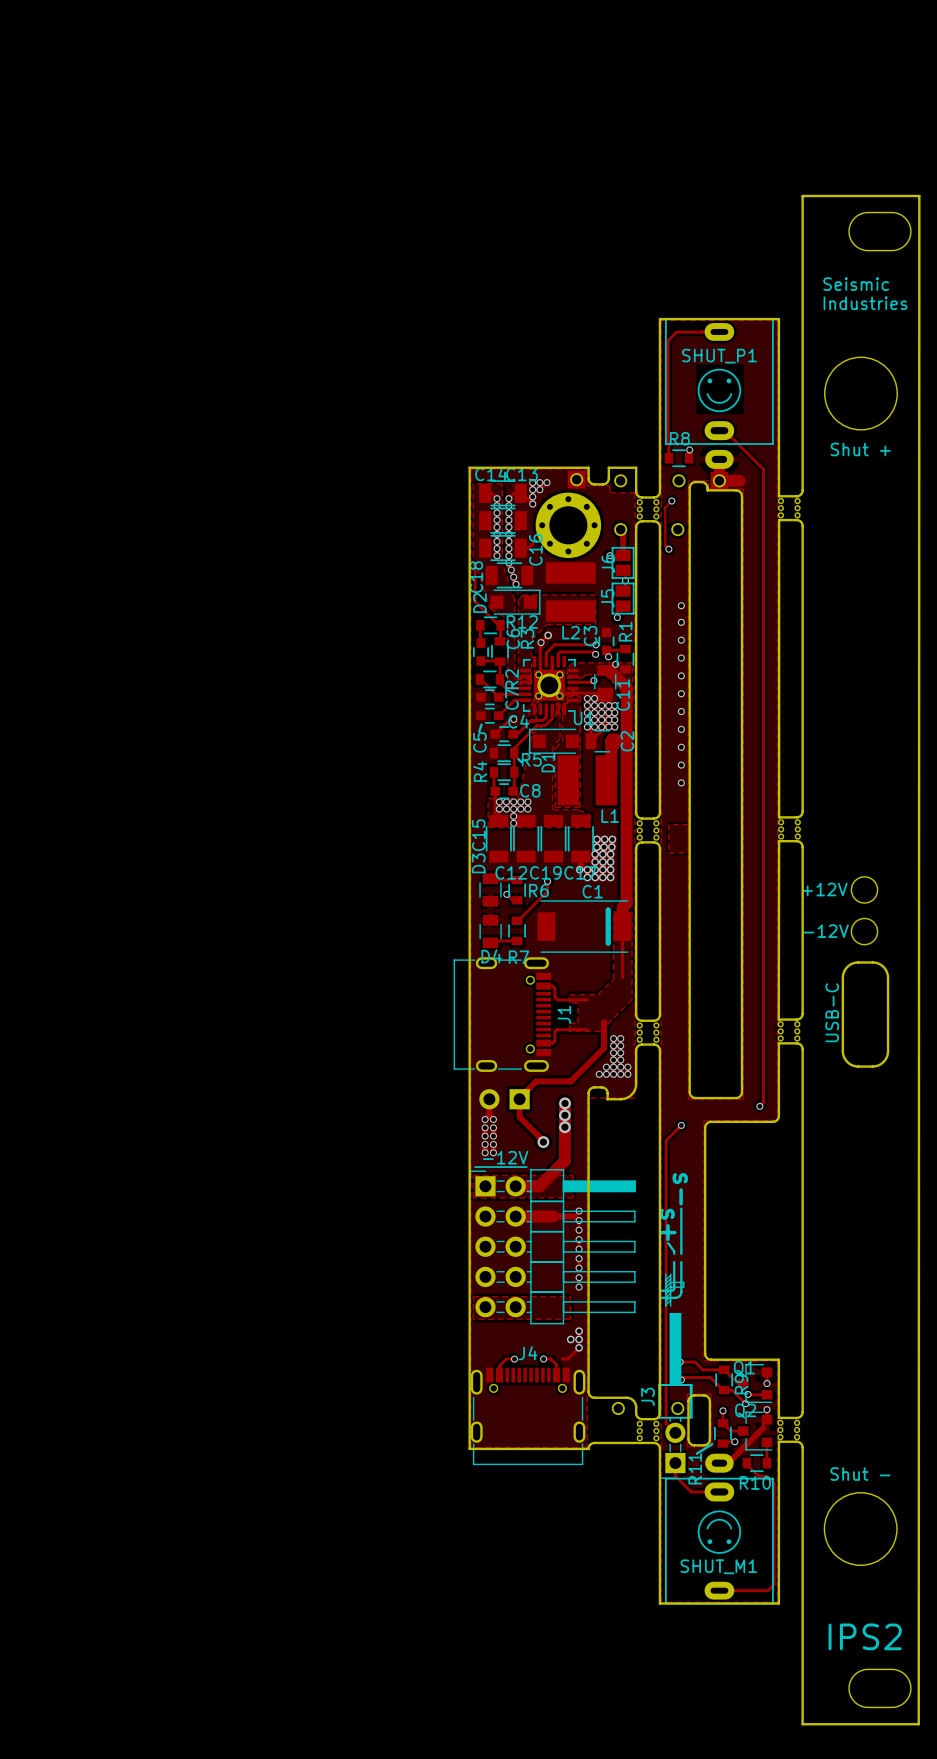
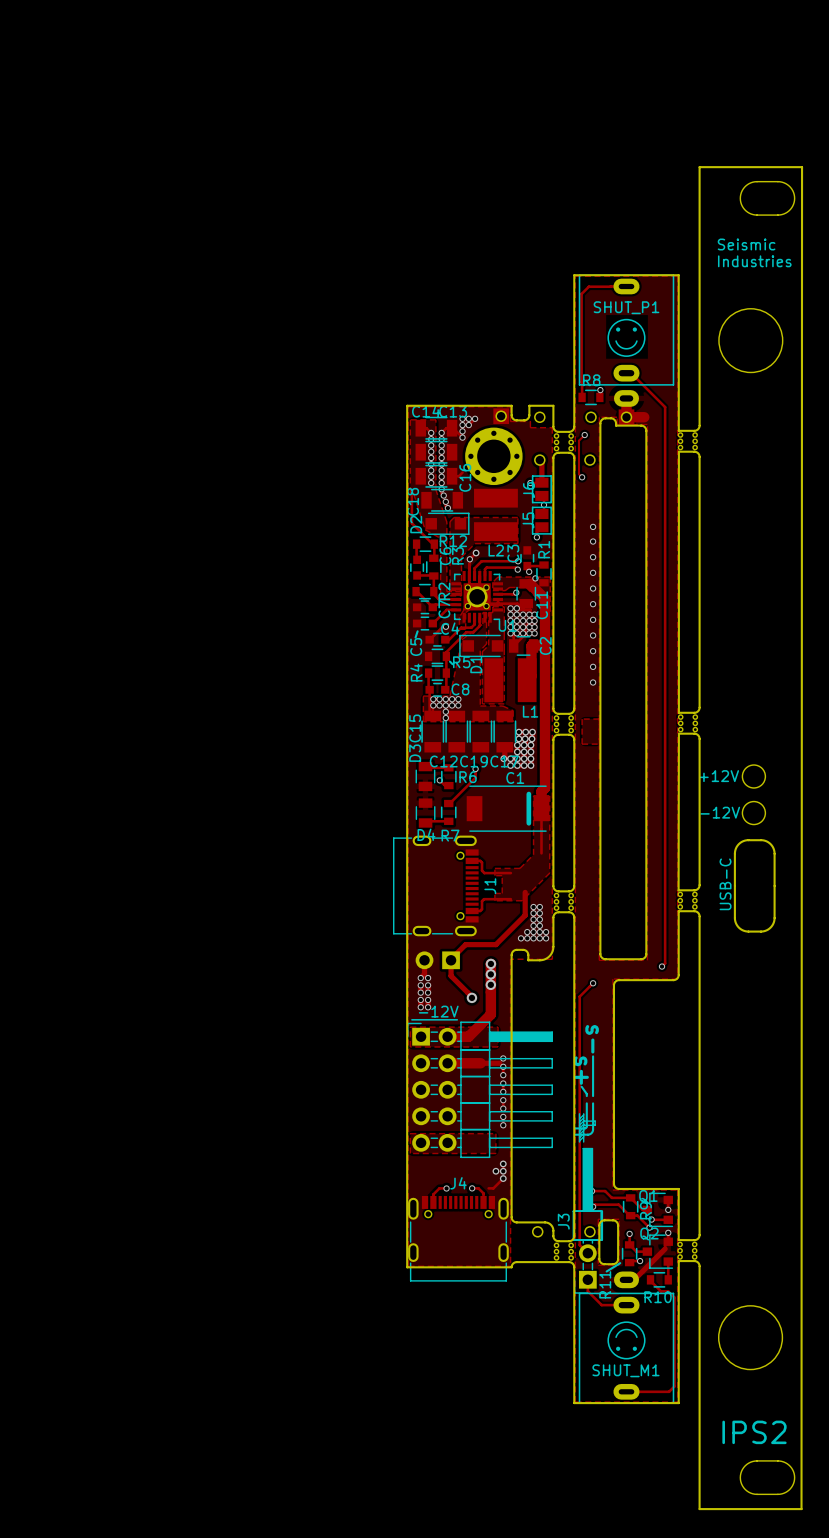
text: Shut + (860, 449) -> none
text: Shut - (860, 1474) -> none

